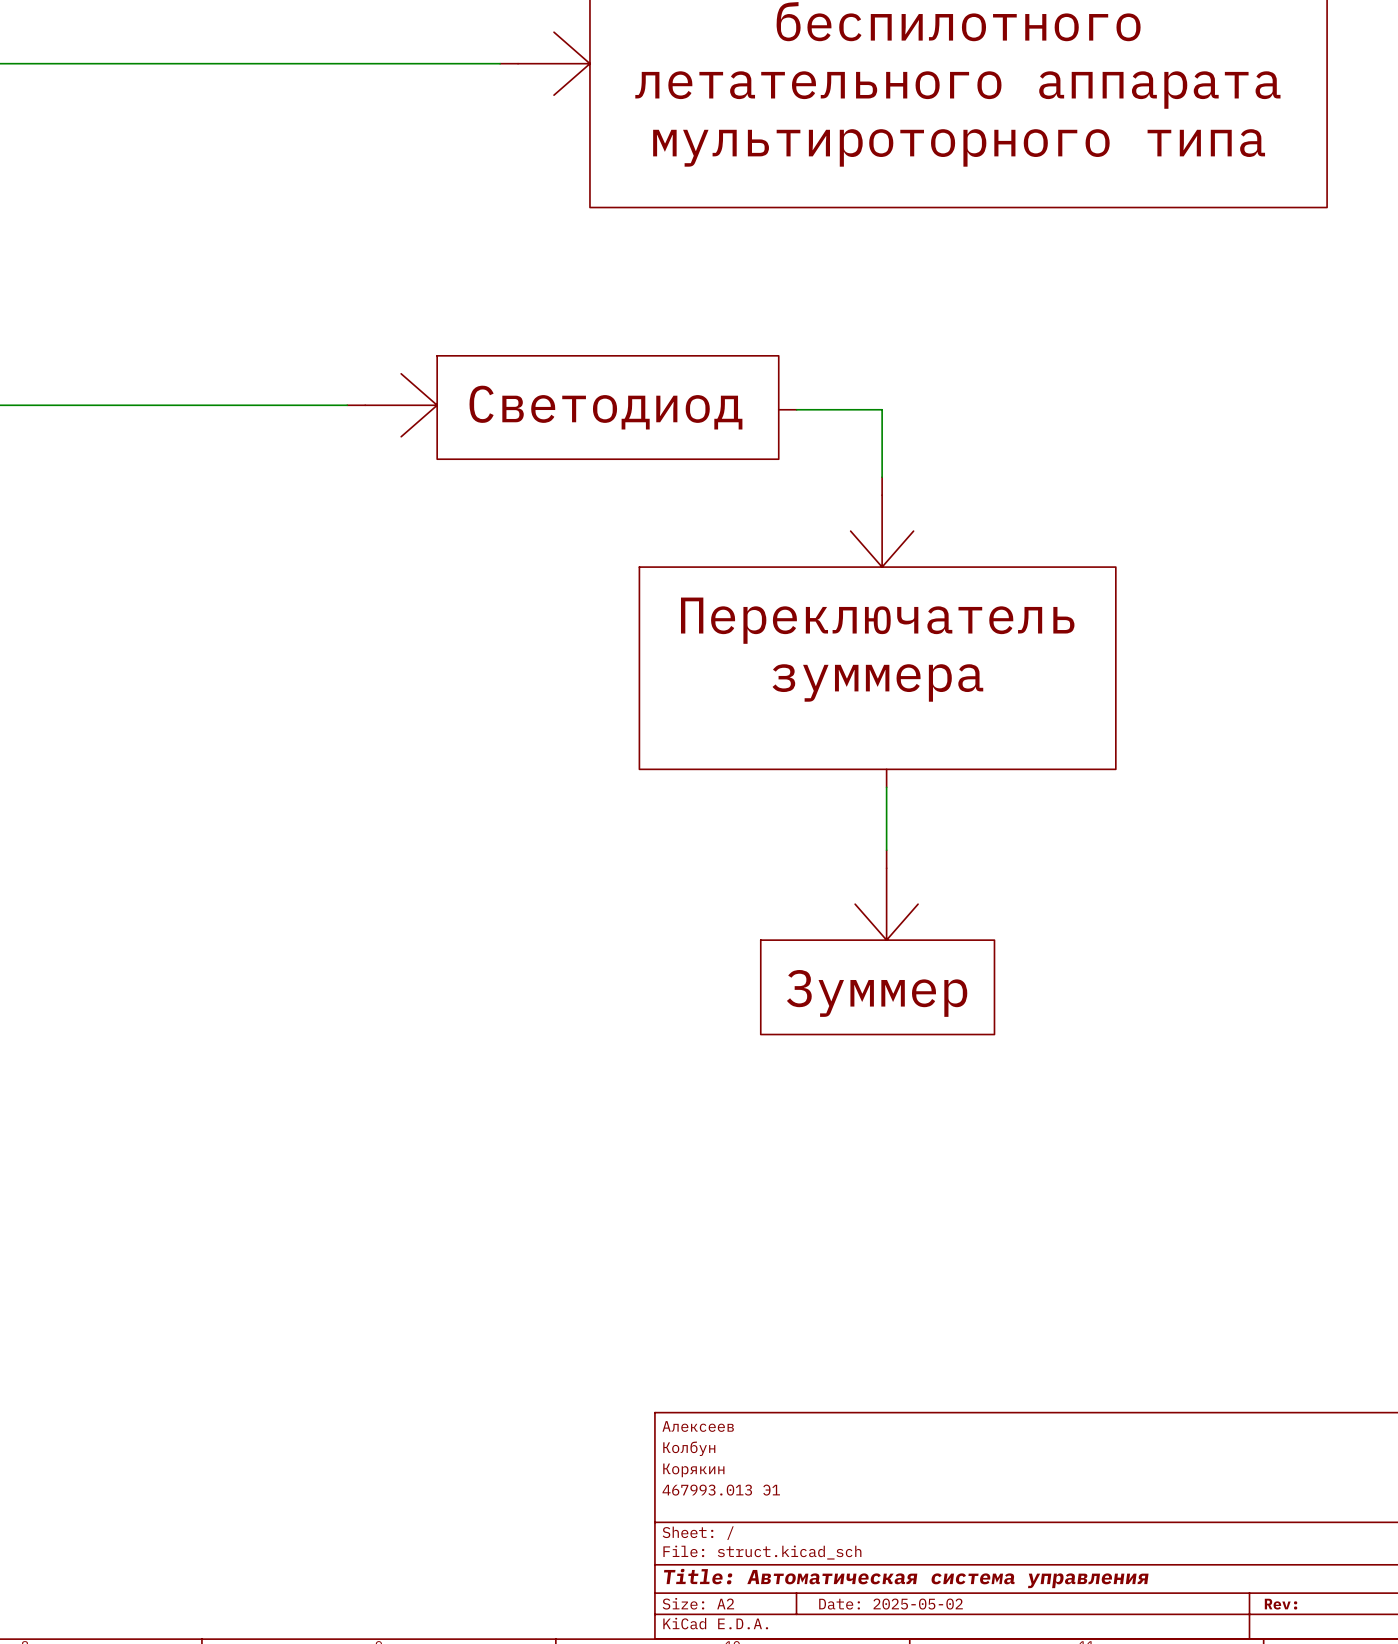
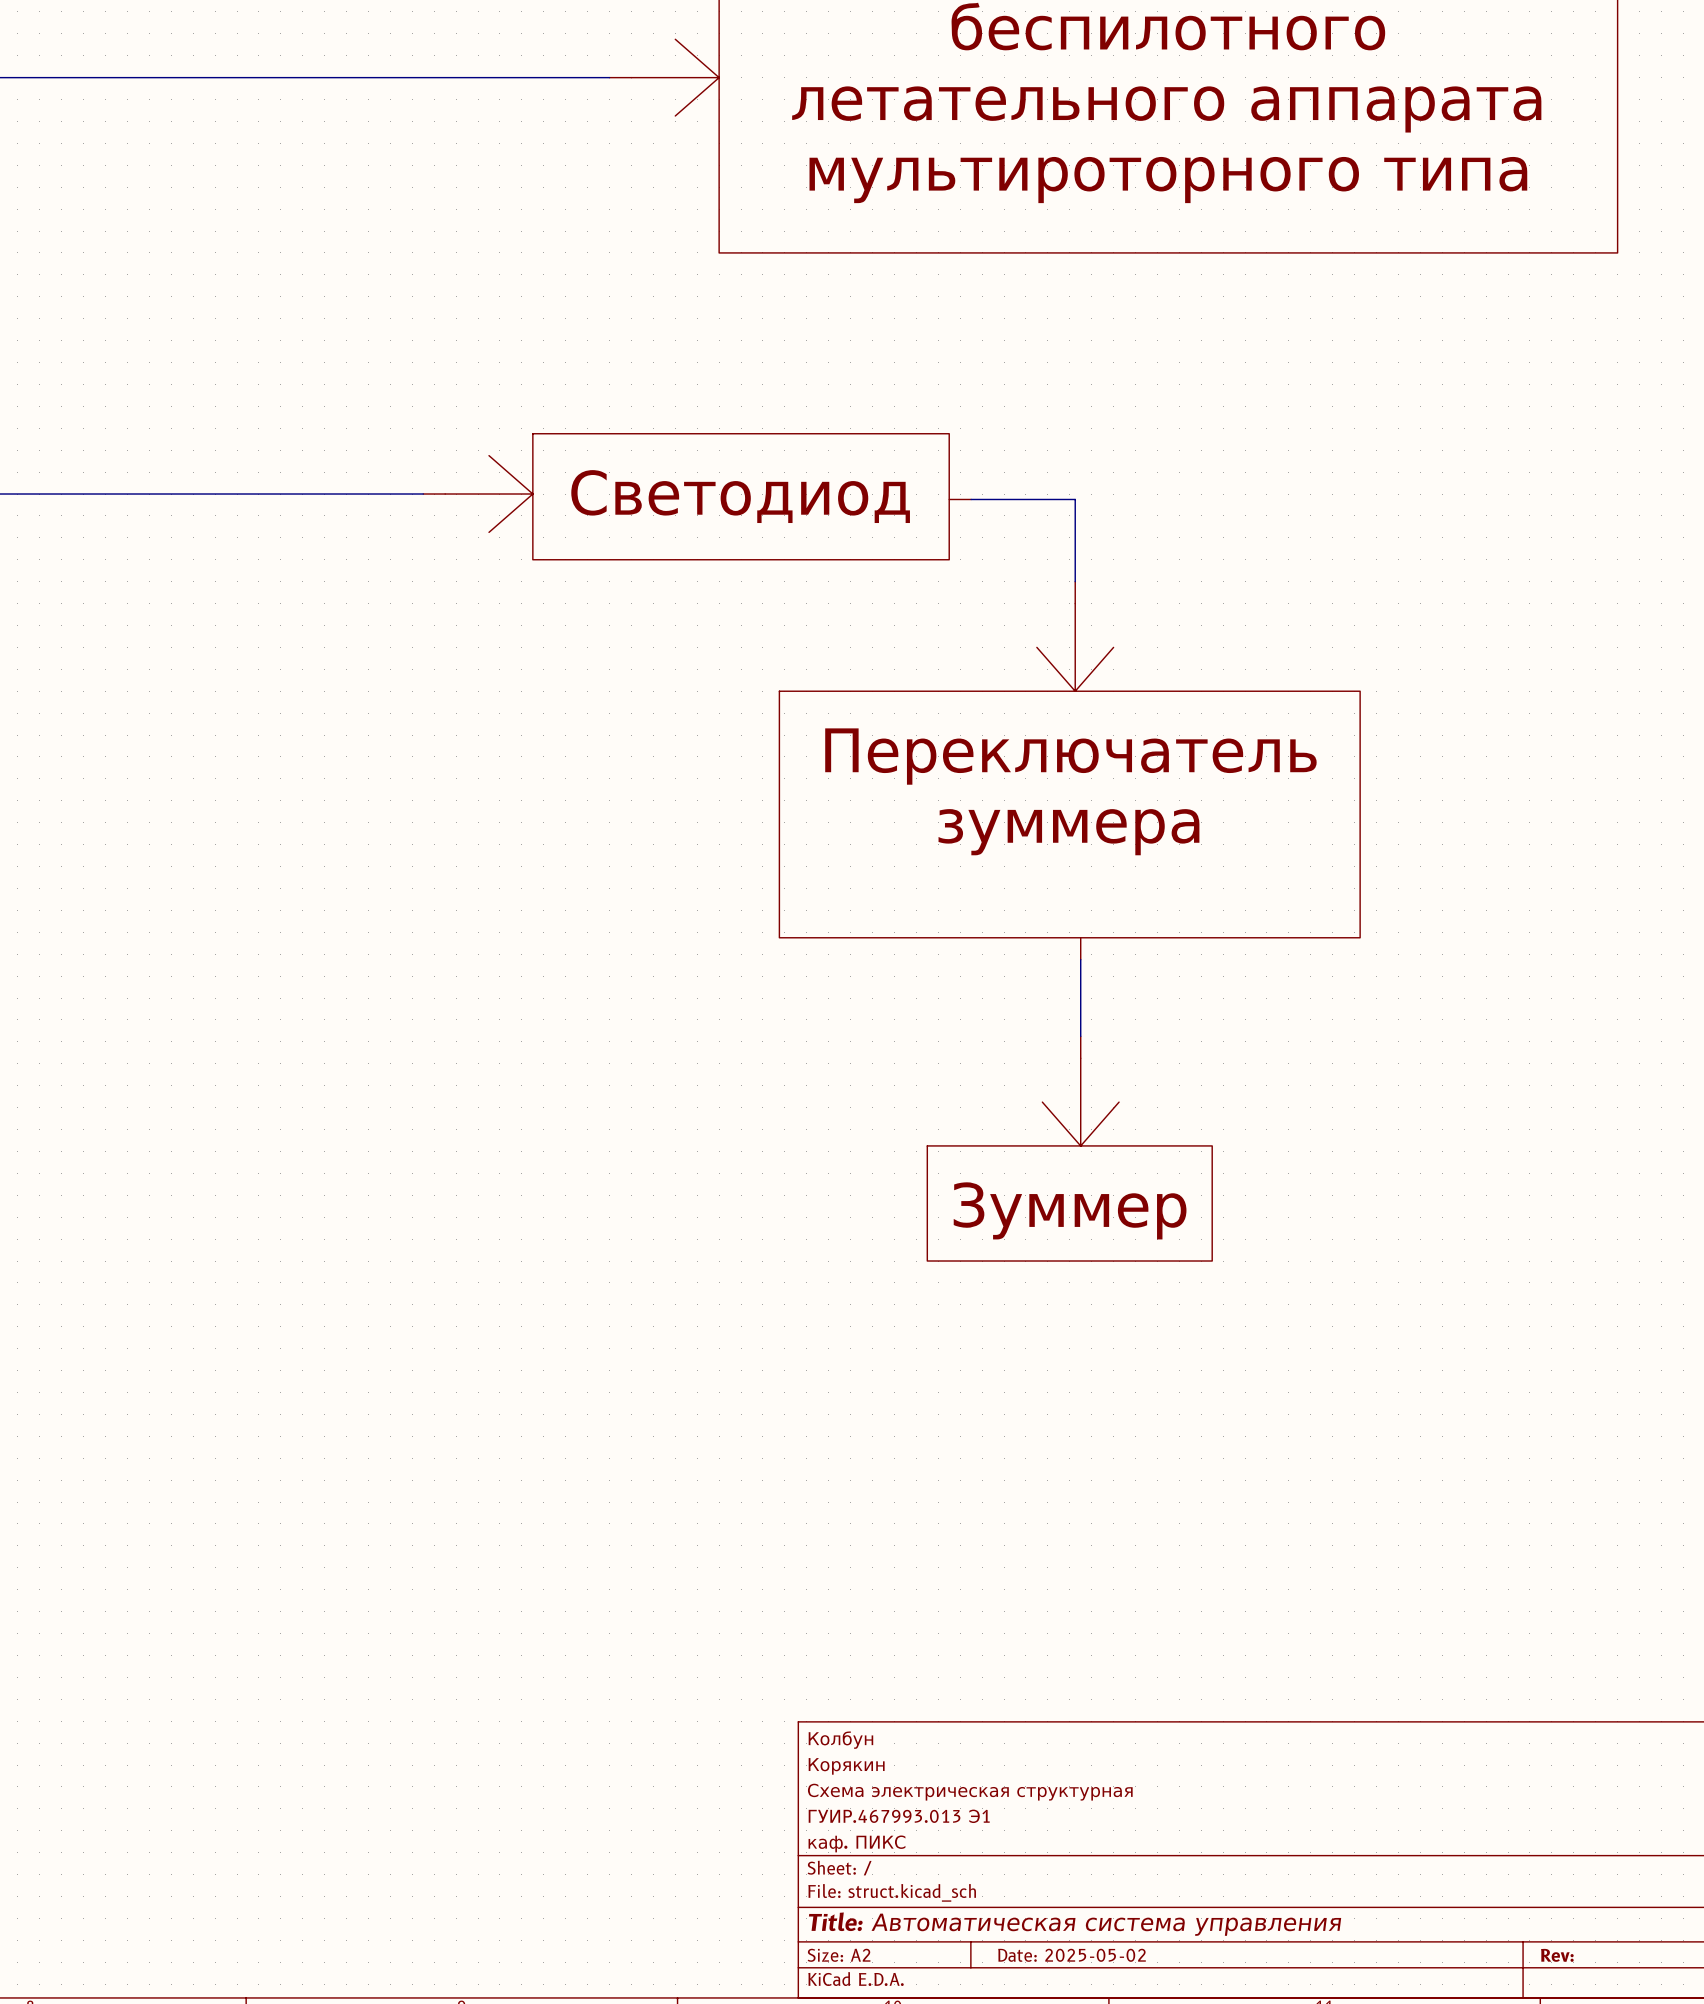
title block: Алексеев (698, 1426) -> Колбун (840, 1740)
title block: Колбун (689, 1448) -> Корякин (846, 1766)
title block: Корякин (693, 1470) -> Схема электрическая структурная (970, 1792)
title block: 467993.013 Э1 (721, 1490) -> ГУИР.467993.013 Э1 (899, 1816)
title block: none -> каф. ПИКС (856, 1843)

